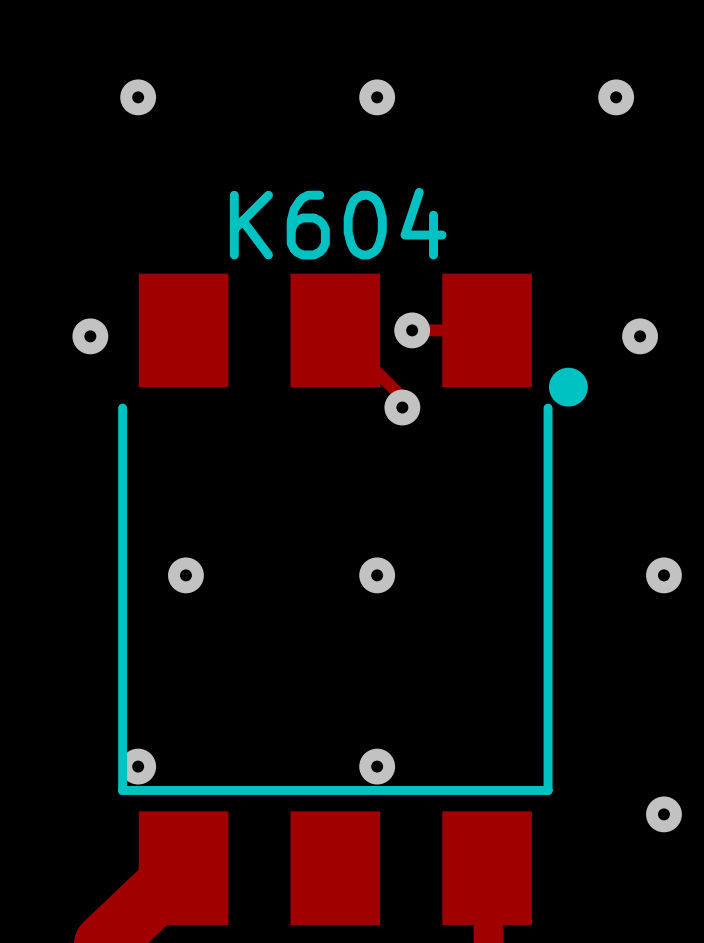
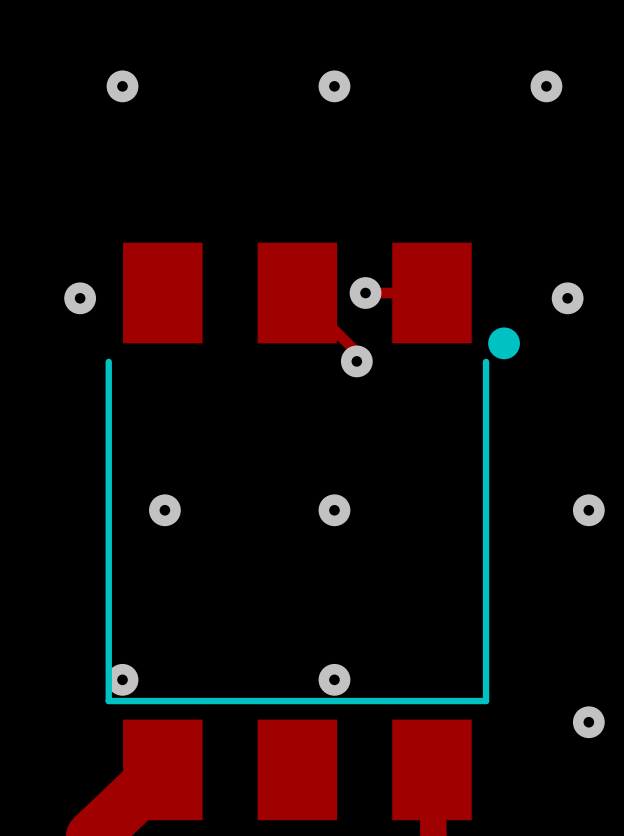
K604: (352, 599) -> none
part: none -> (312, 531)

